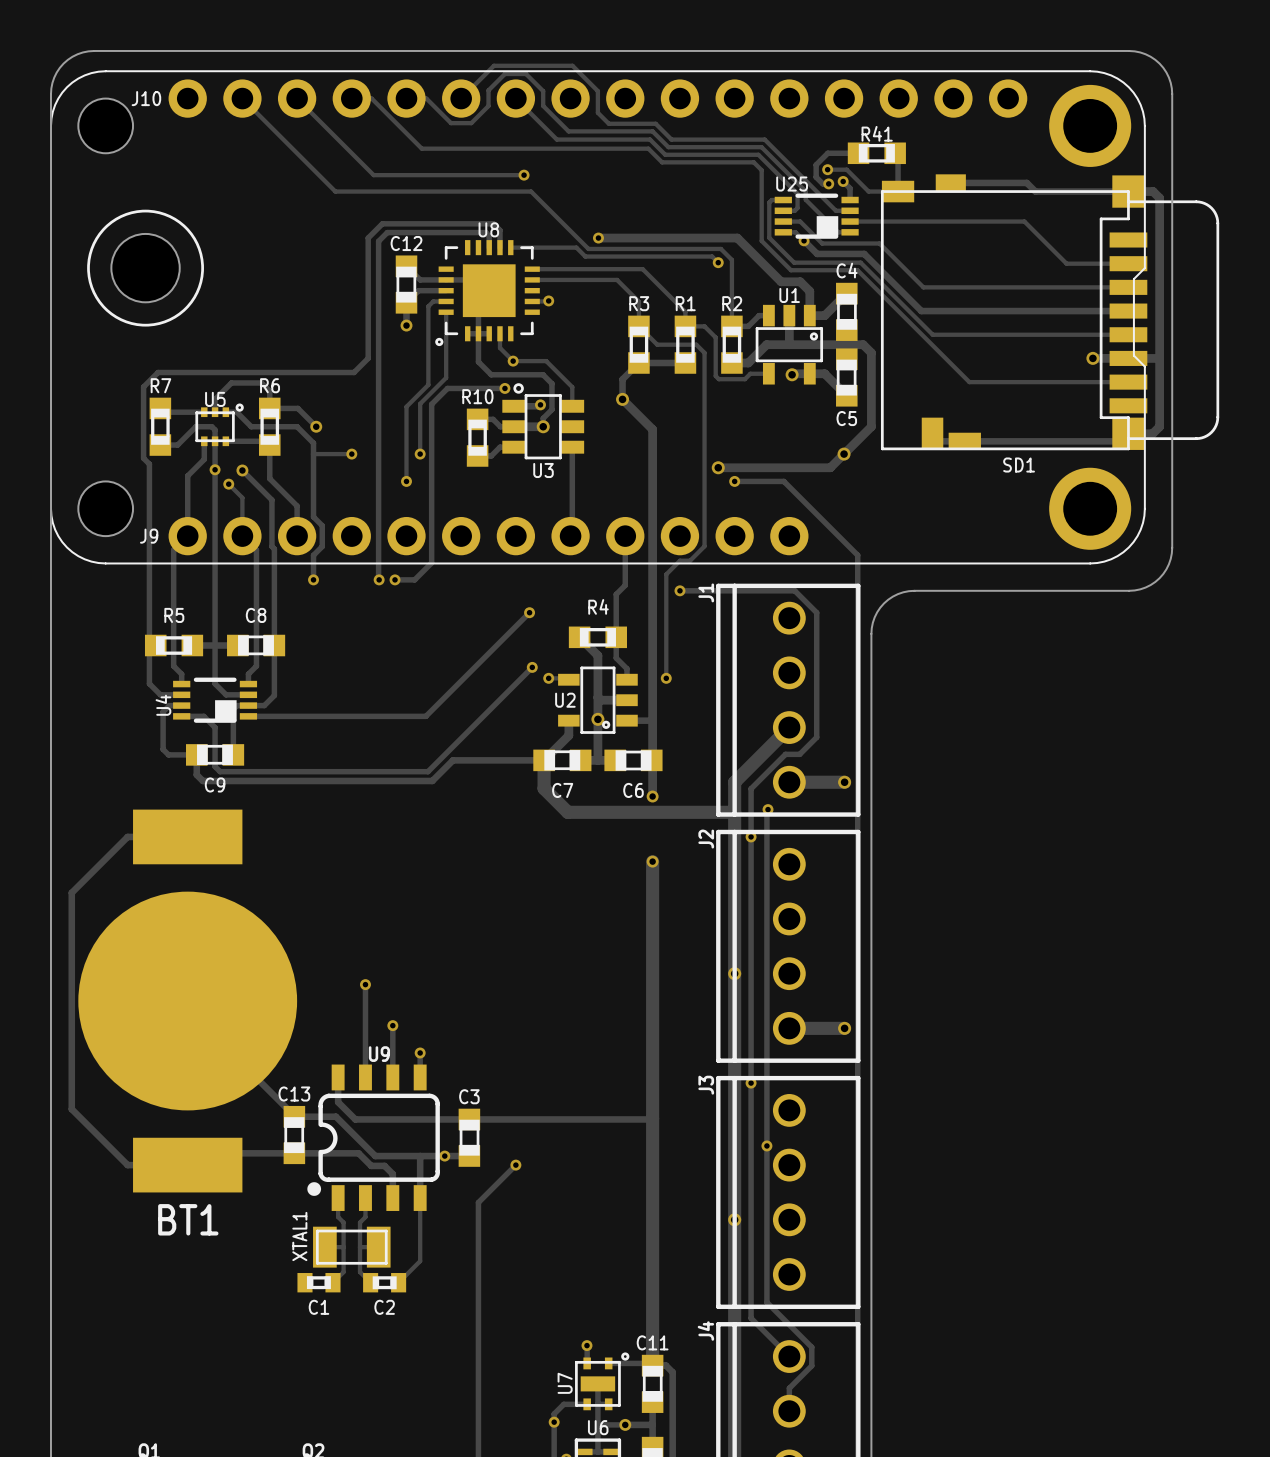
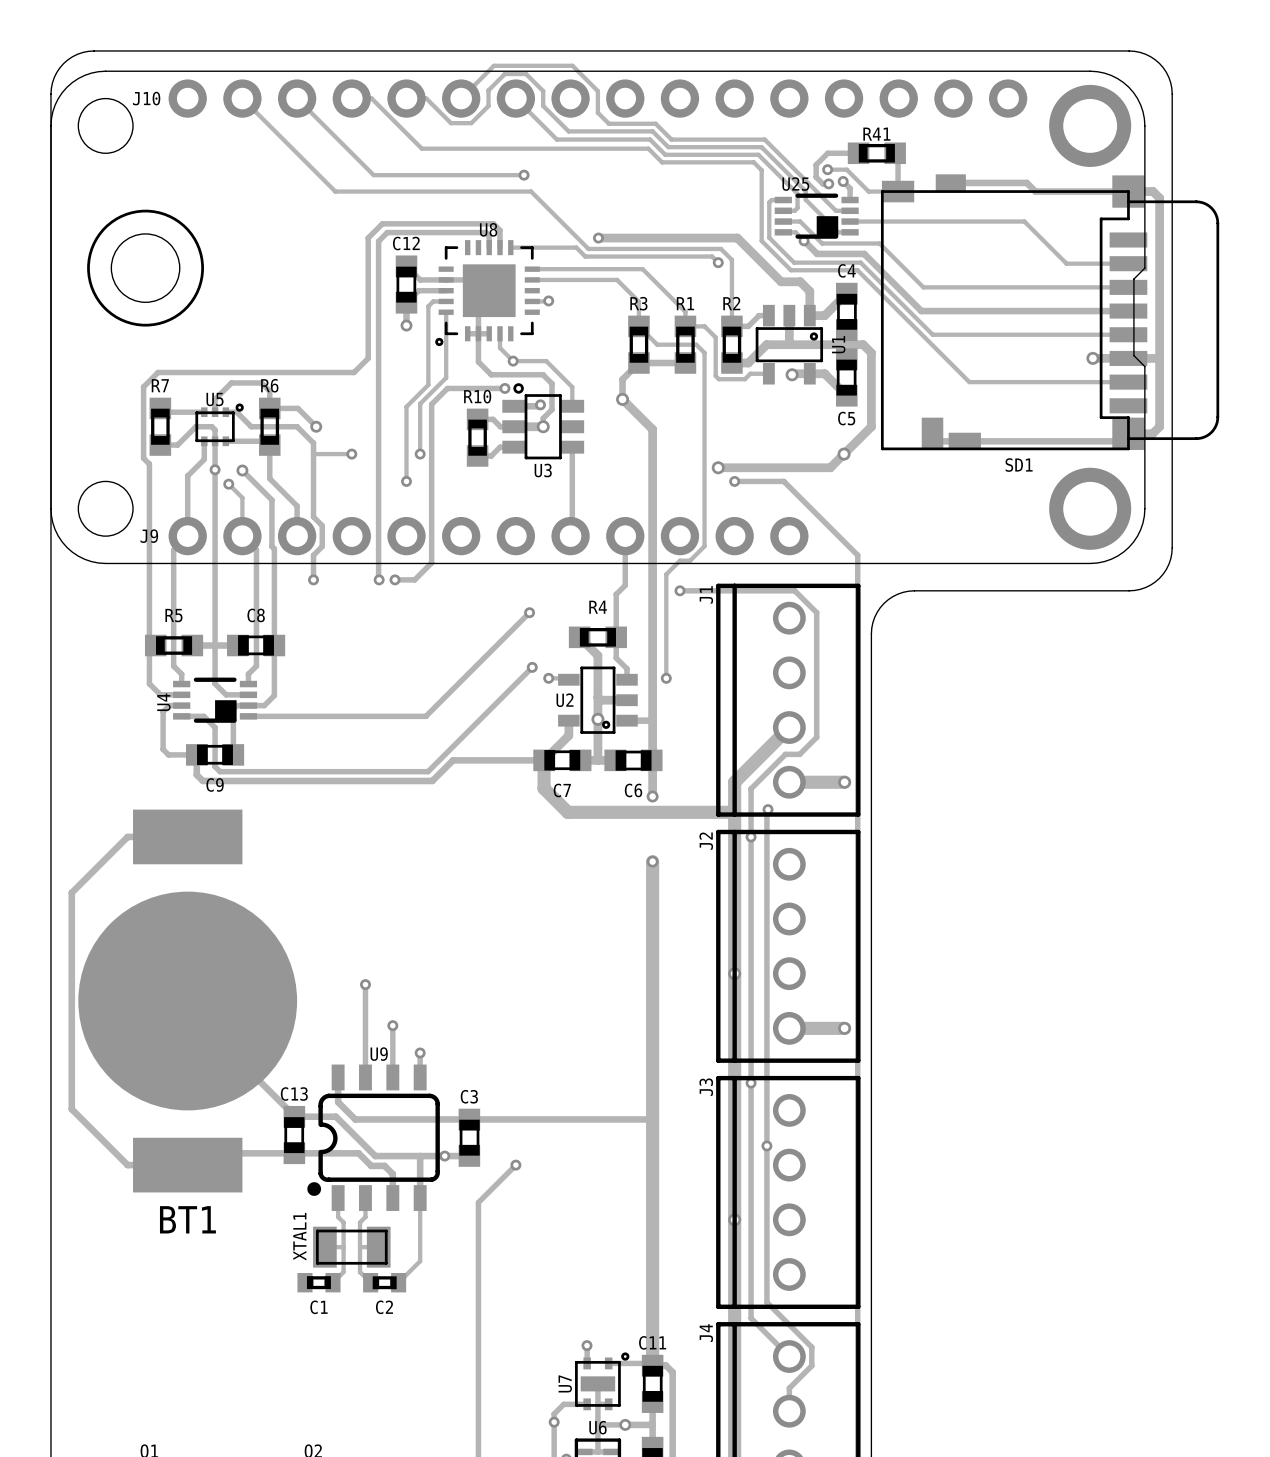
U1 name rotation: 0° (789, 295) -> 90° counterclockwise (838, 344)
U1 name position: U1 (789, 295) -> U1 (838, 344)

